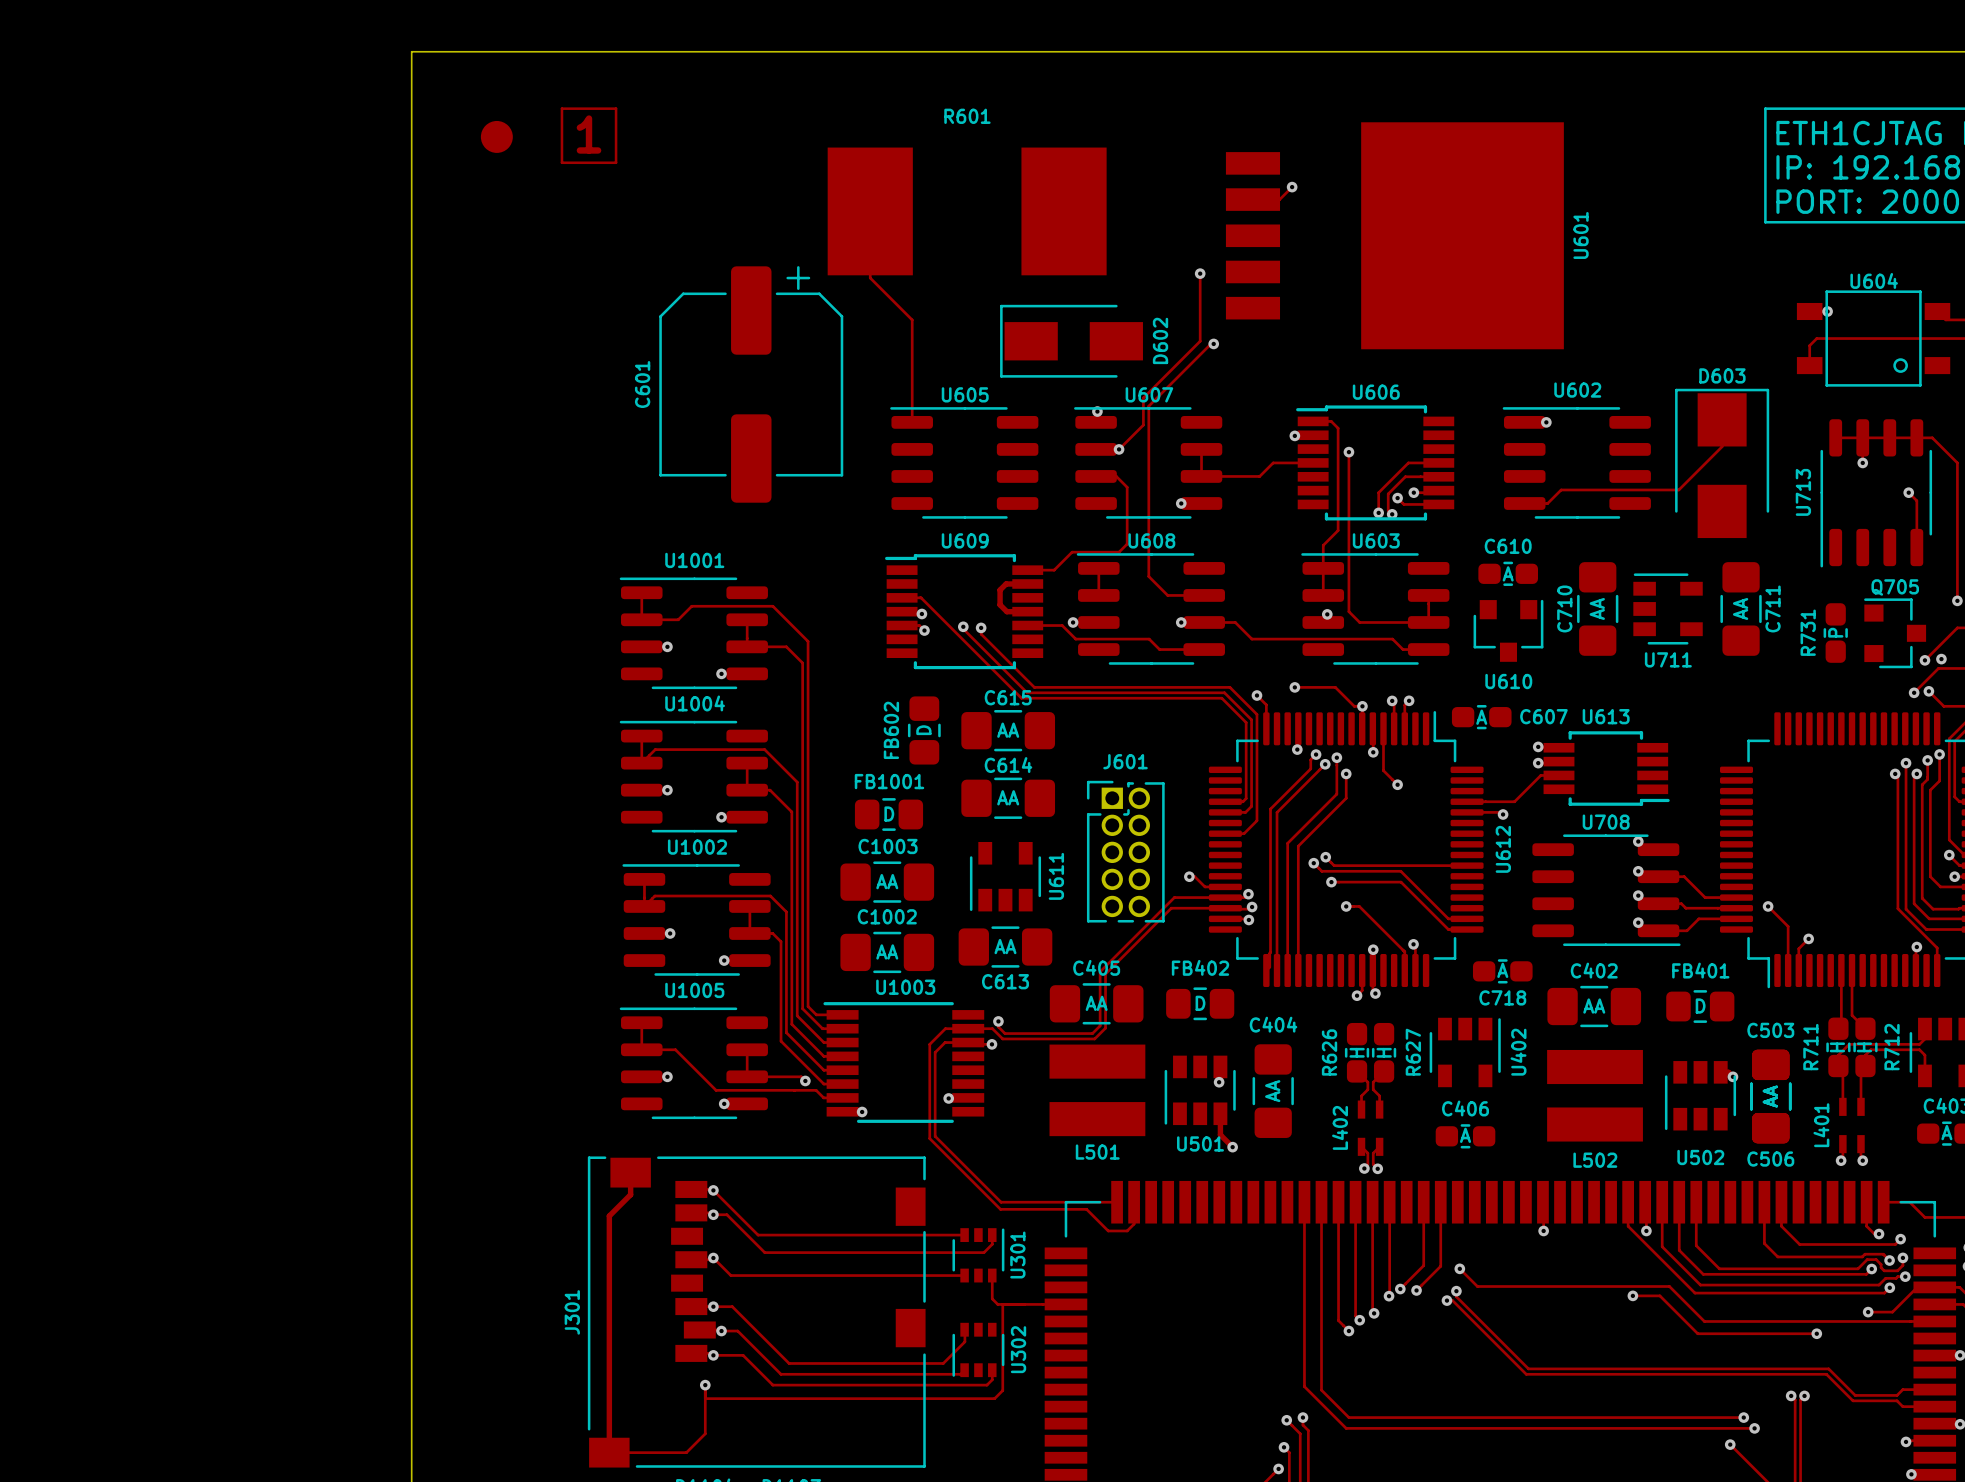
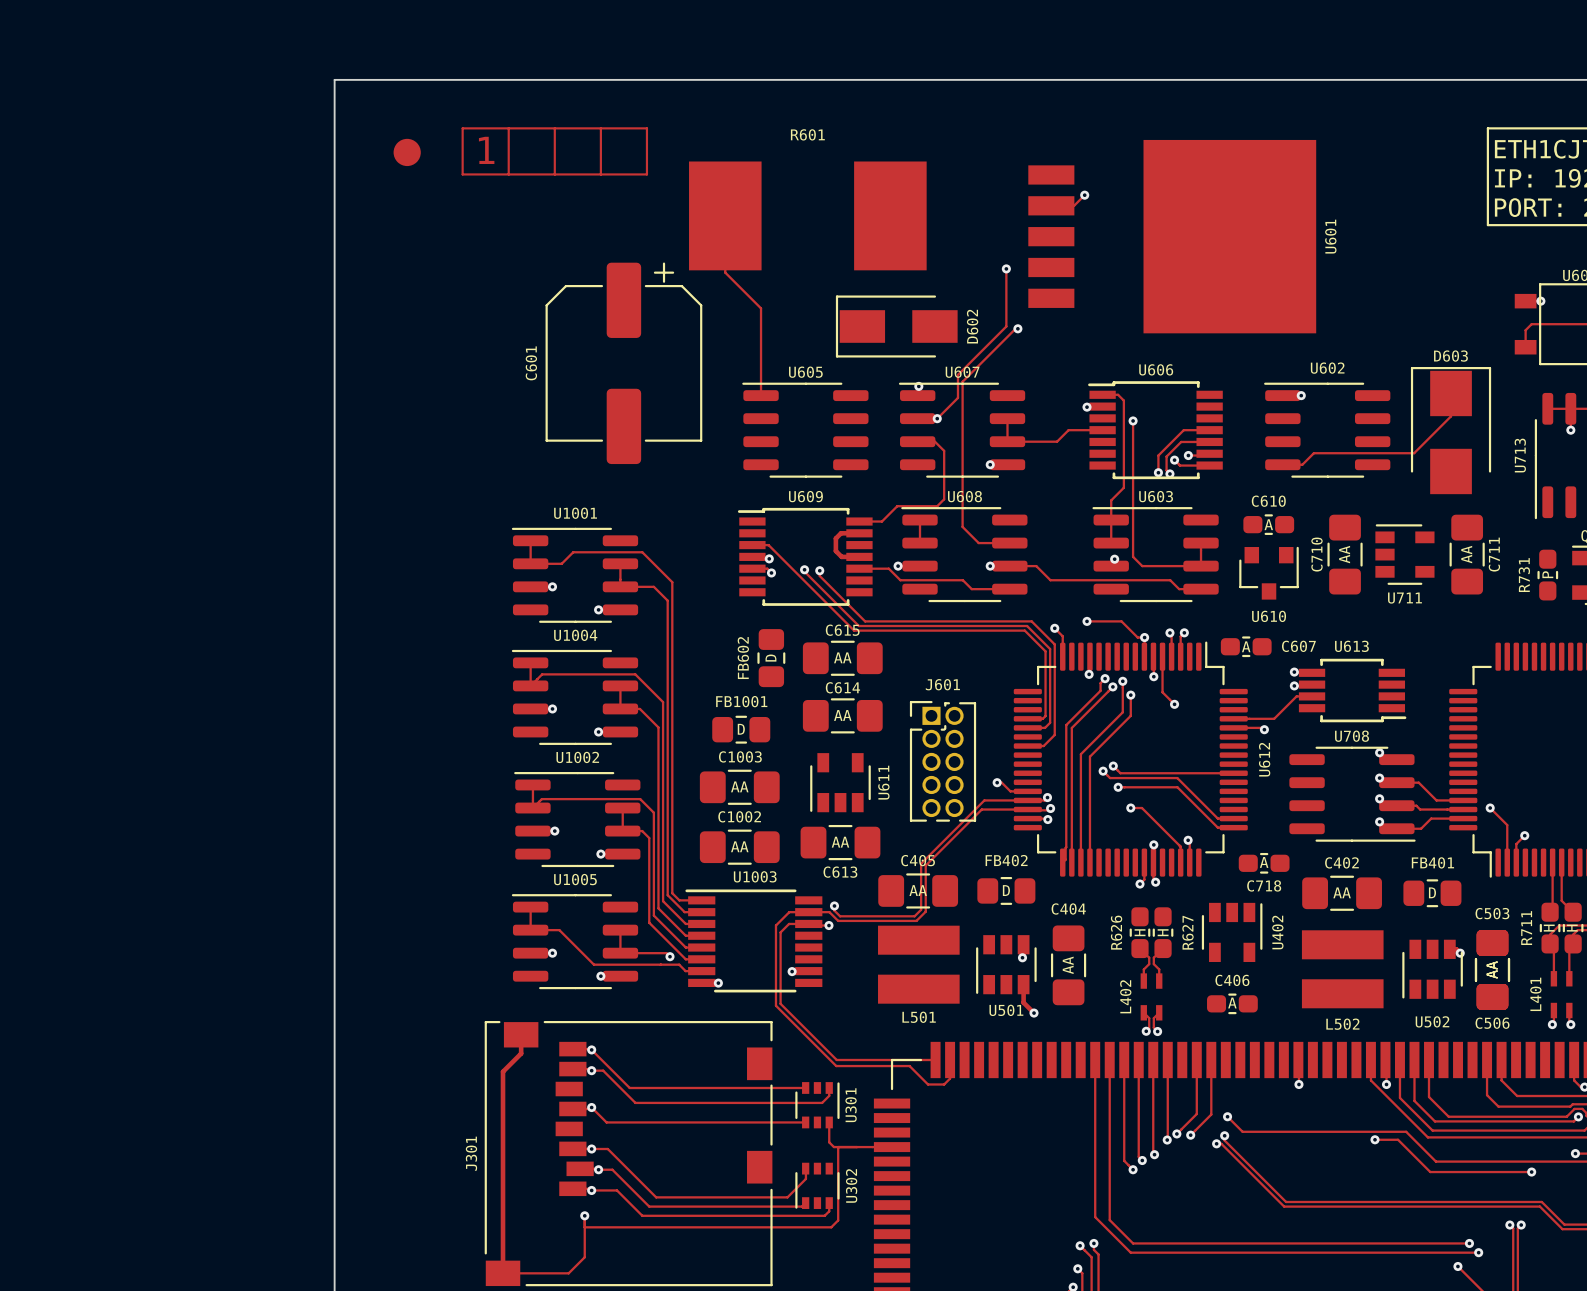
track: none -> (508, 128) (646, 128) (646, 174) (508, 174)
track: none -> (554, 128) (554, 174)
track: none -> (600, 128) (600, 174)

